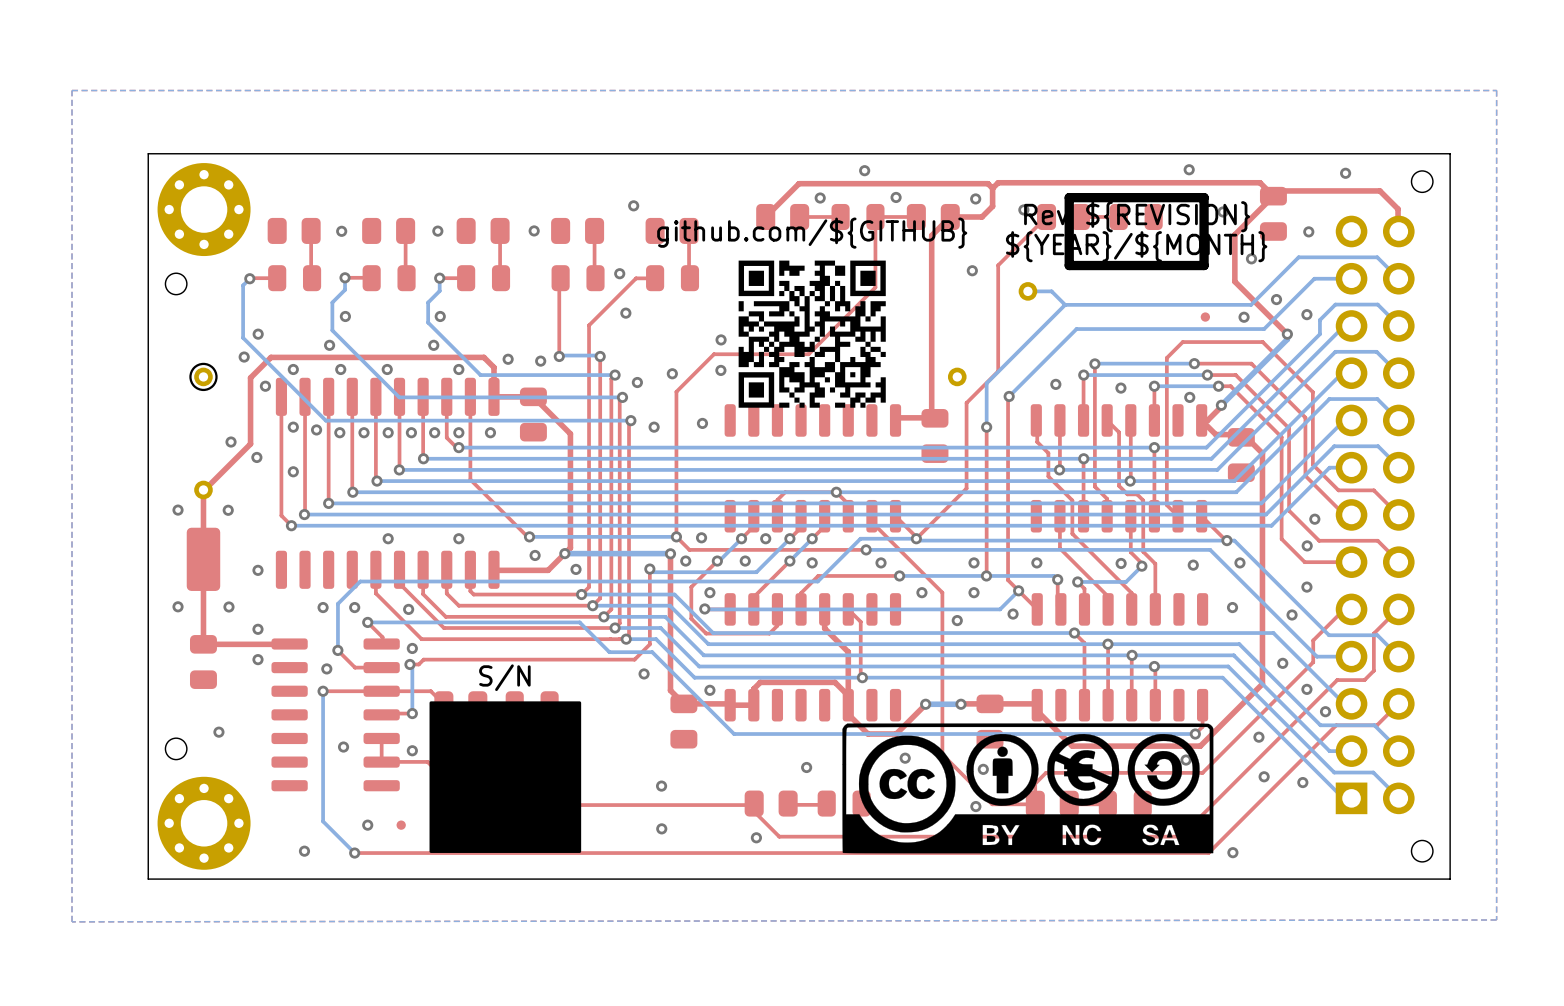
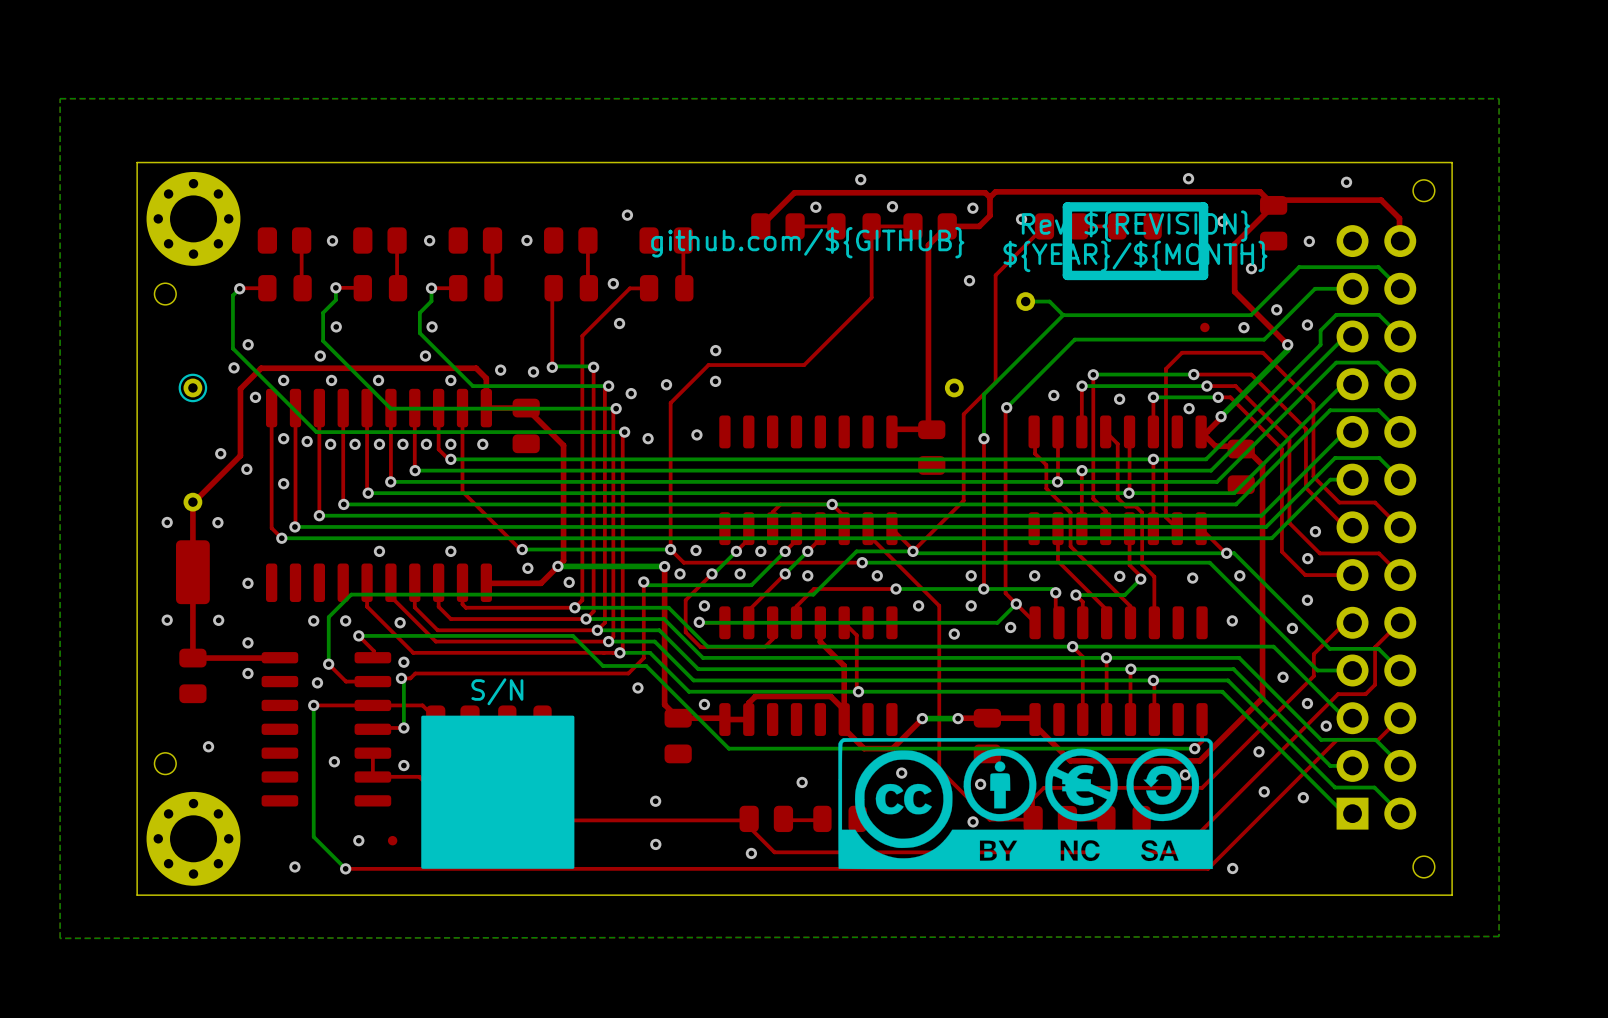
drawing: [738, 260, 886, 408] -> none

